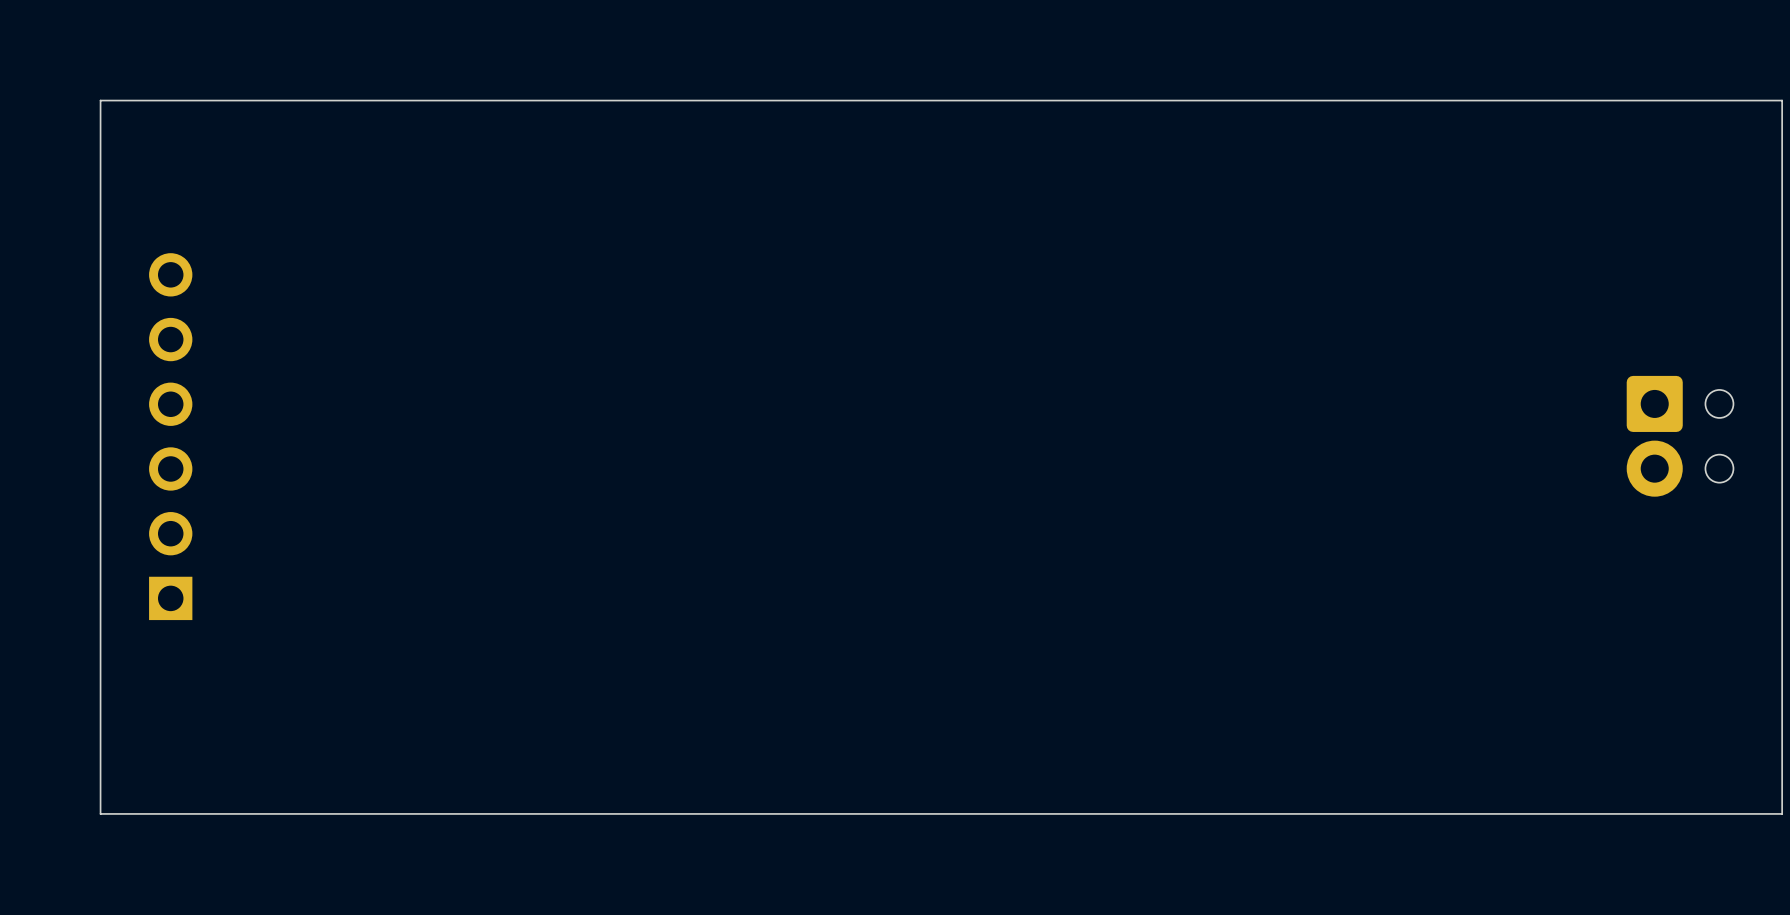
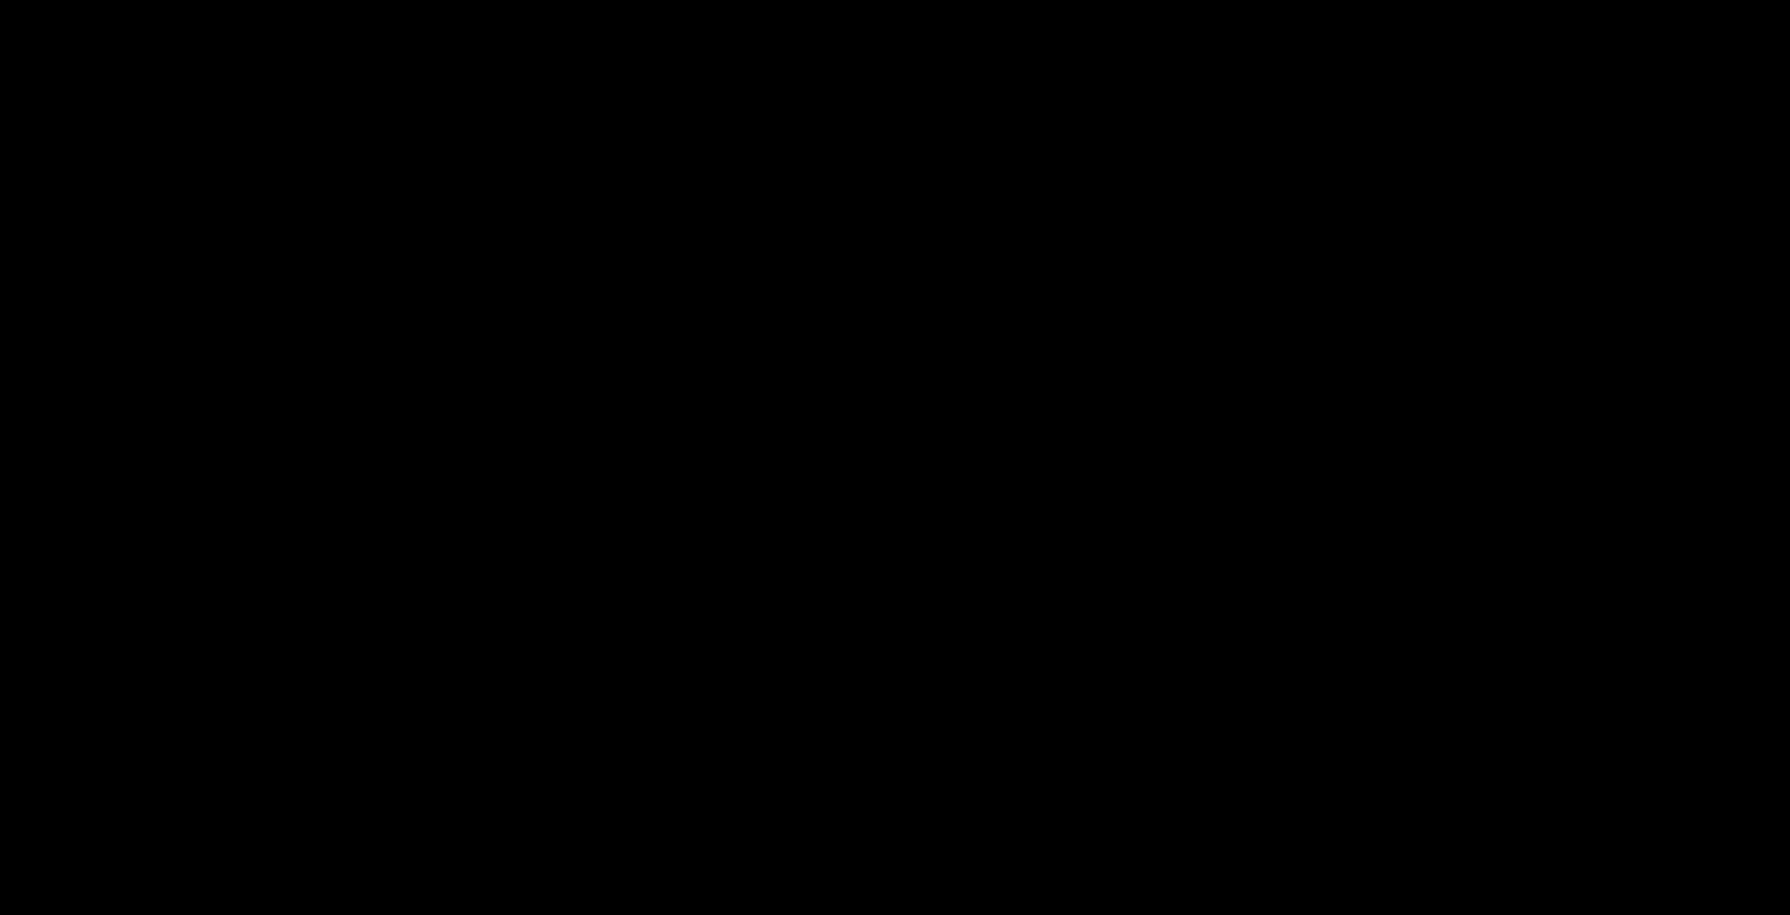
board edge: (1782, 100) (100, 100) (100, 813) (1782, 813) (1782, 100) -> none
part: (170, 436) -> none
part: (1680, 436) -> none

